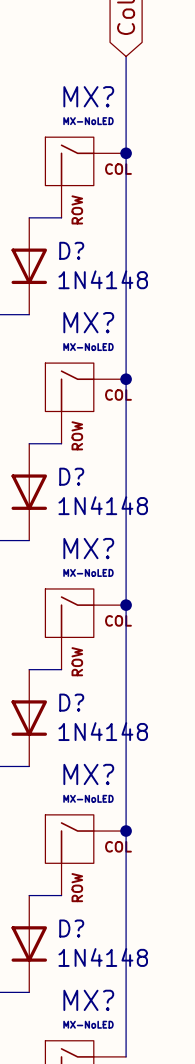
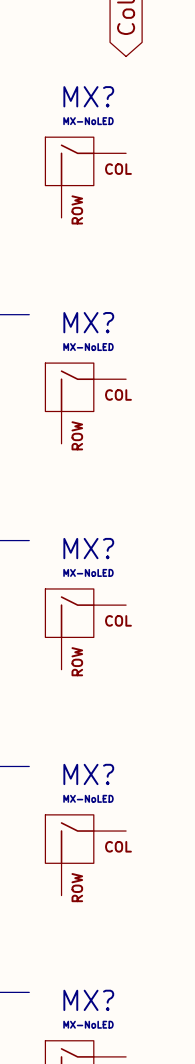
wire: (126, 56) (126, 1056) -> none
junction: (126, 153) -> none
wire: (29, 217) (61, 217) -> none
D?: 1N4148 (29, 266) -> none
junction: (126, 379) -> none
wire: (29, 443) (61, 443) -> none
D?: 1N4148 (29, 492) -> none
junction: (126, 605) -> none
wire: (29, 669) (61, 669) -> none
D?: 1N4148 (29, 718) -> none
junction: (126, 831) -> none
wire: (29, 895) (61, 895) -> none
D?: 1N4148 (29, 943) -> none

